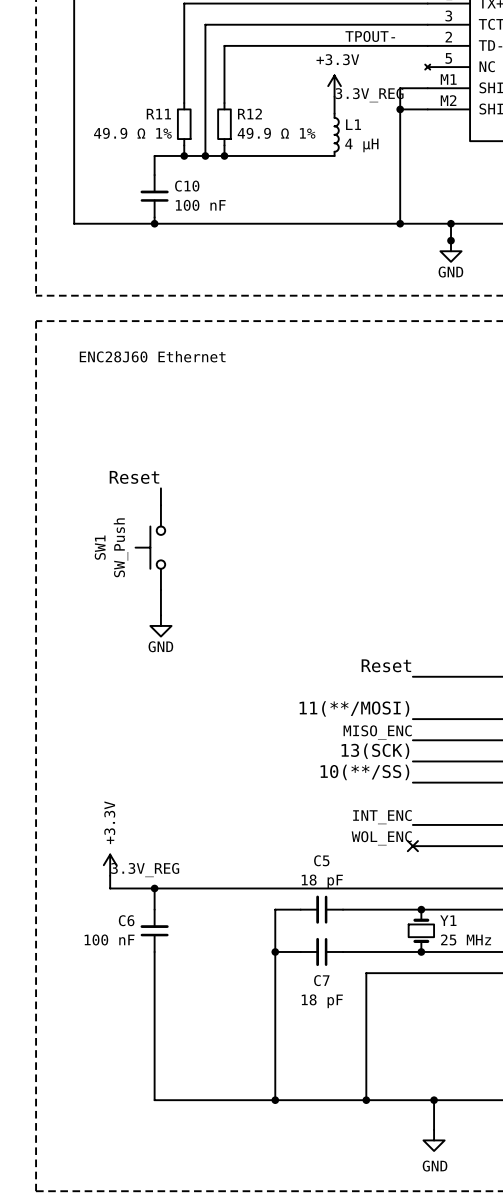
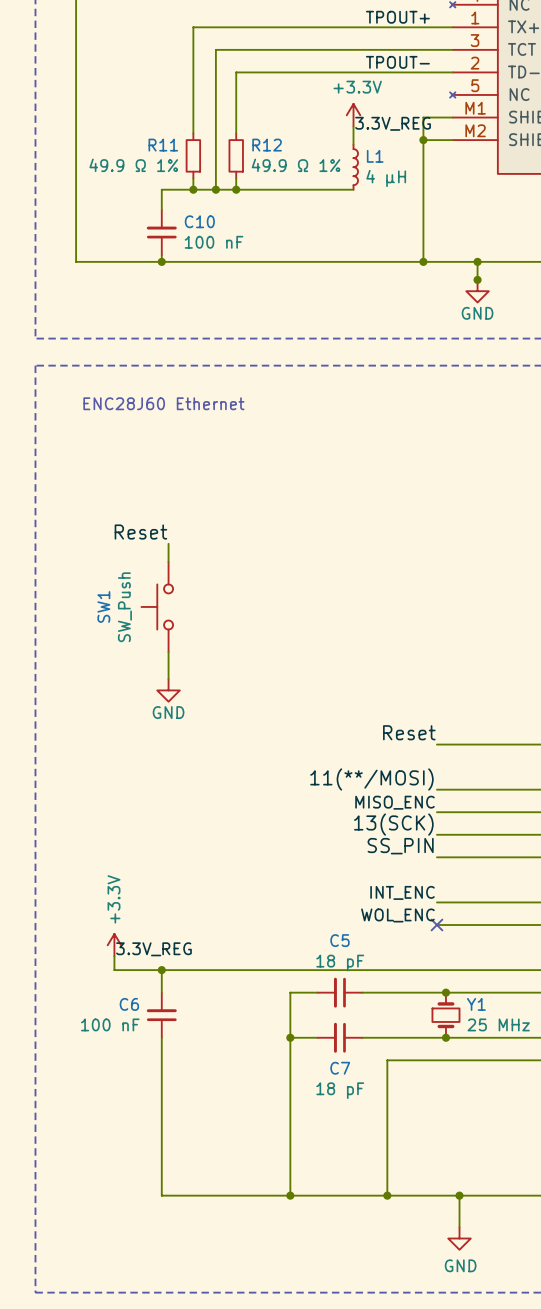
label: 10(**/SS) (364, 772) -> SS_PIN (400, 846)

